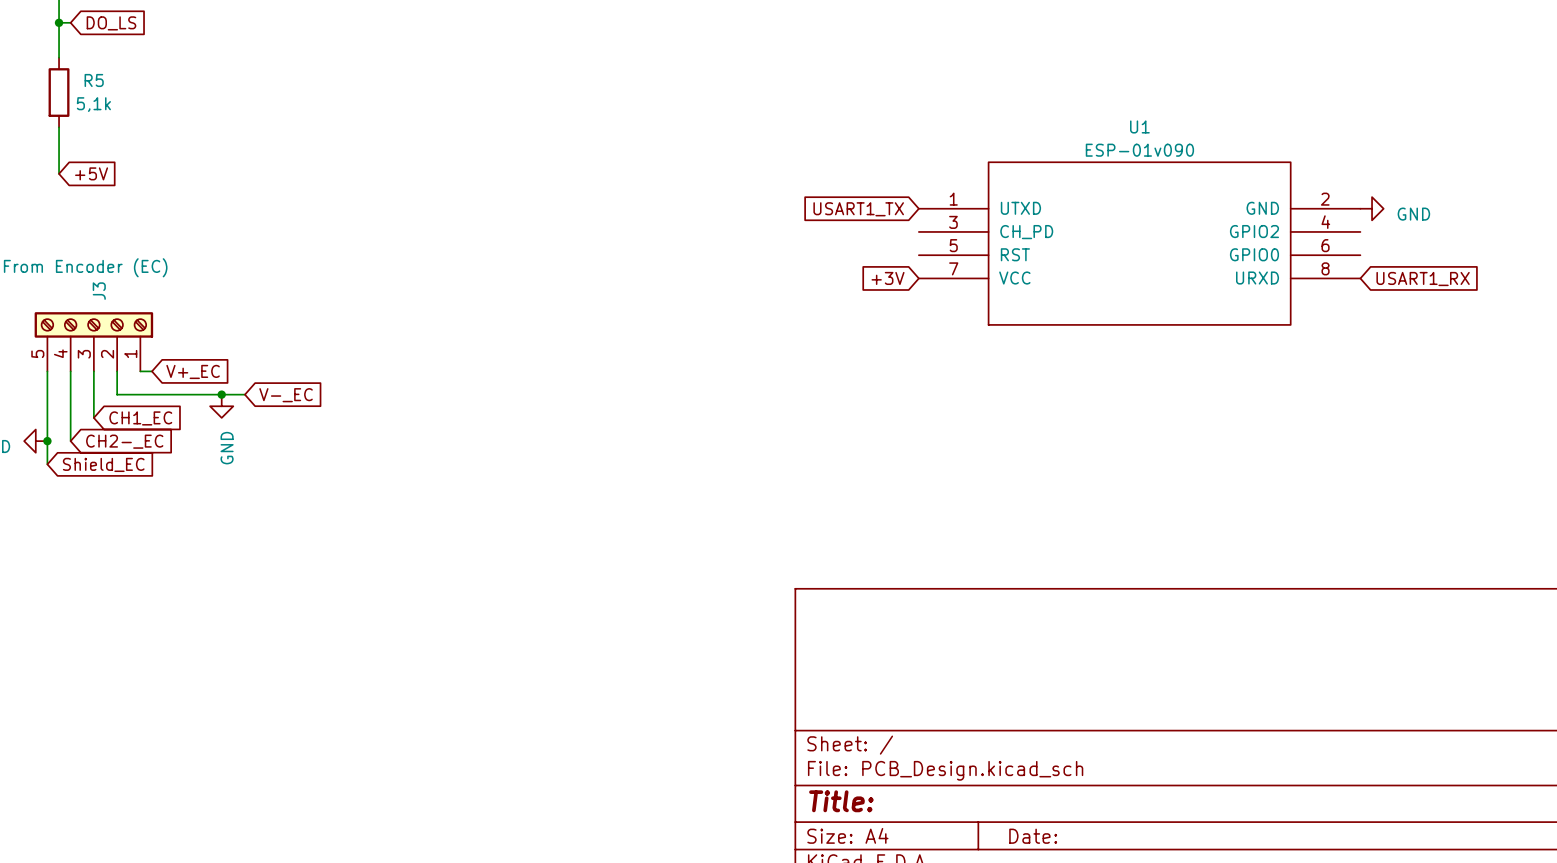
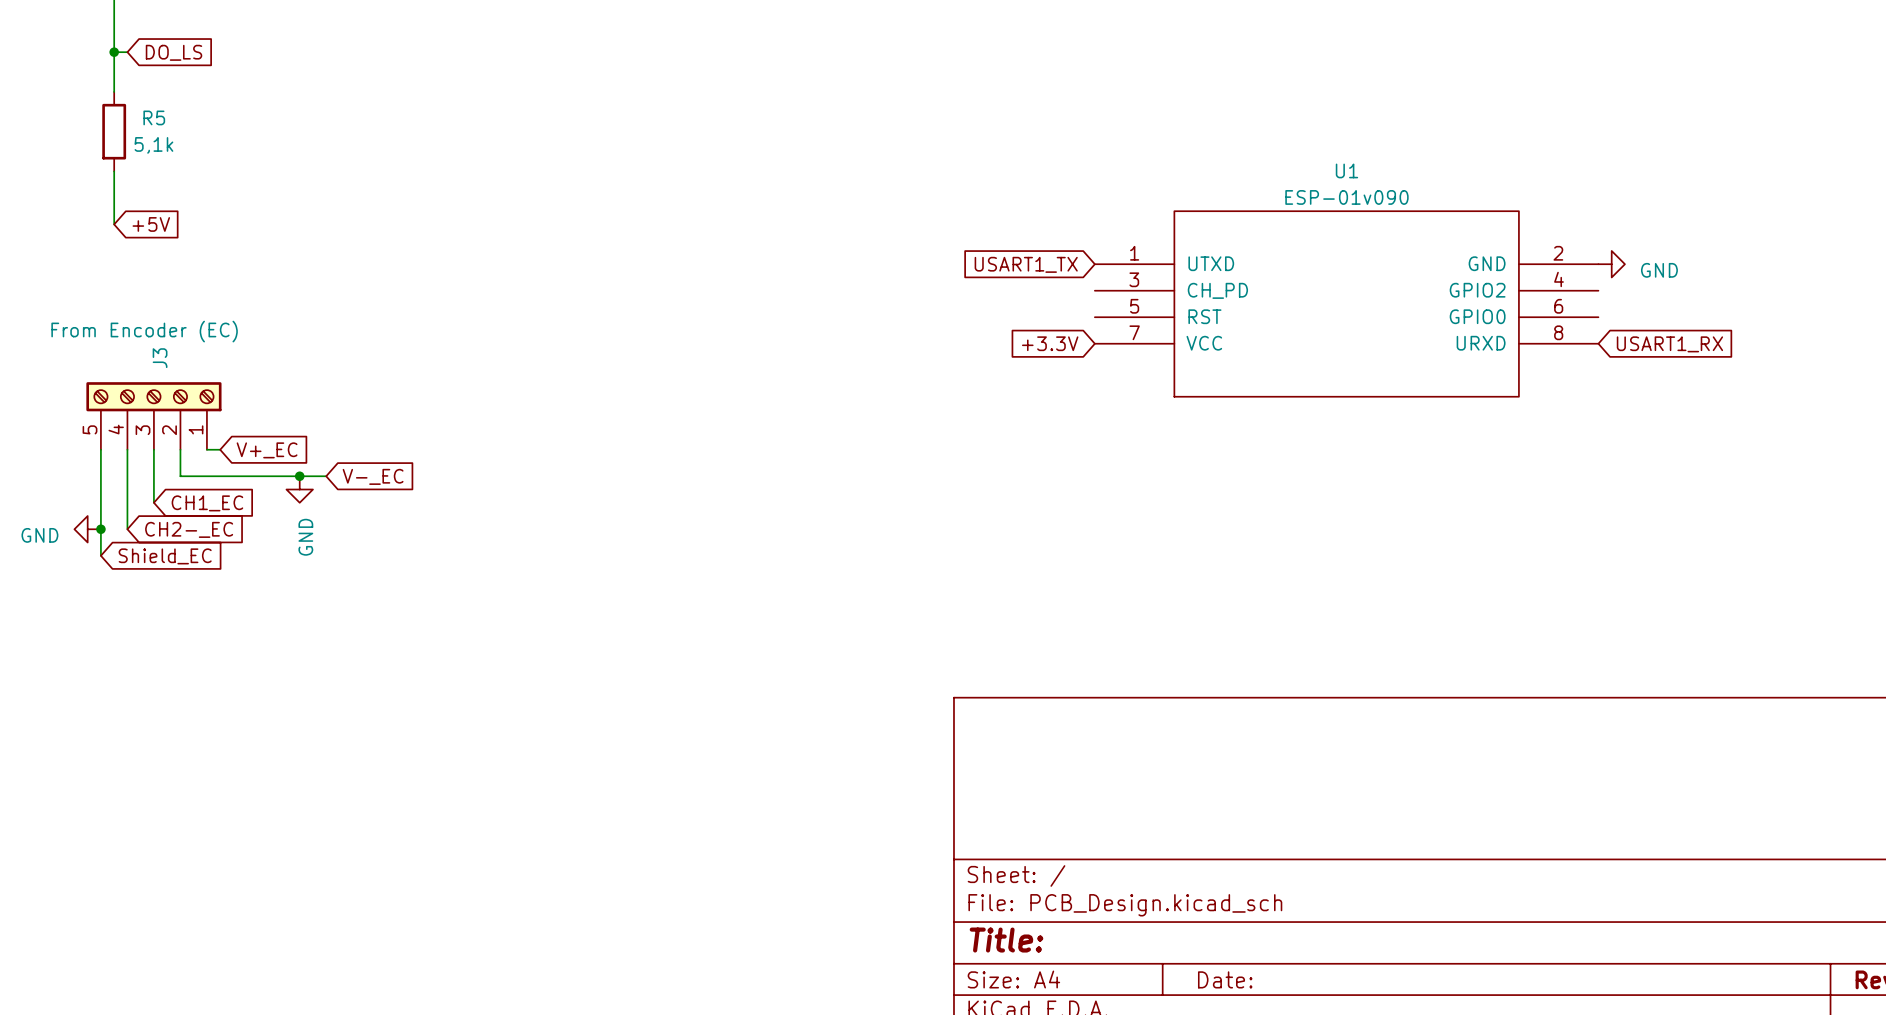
global label: +3V (888, 278) -> +3.3V (1050, 343)

